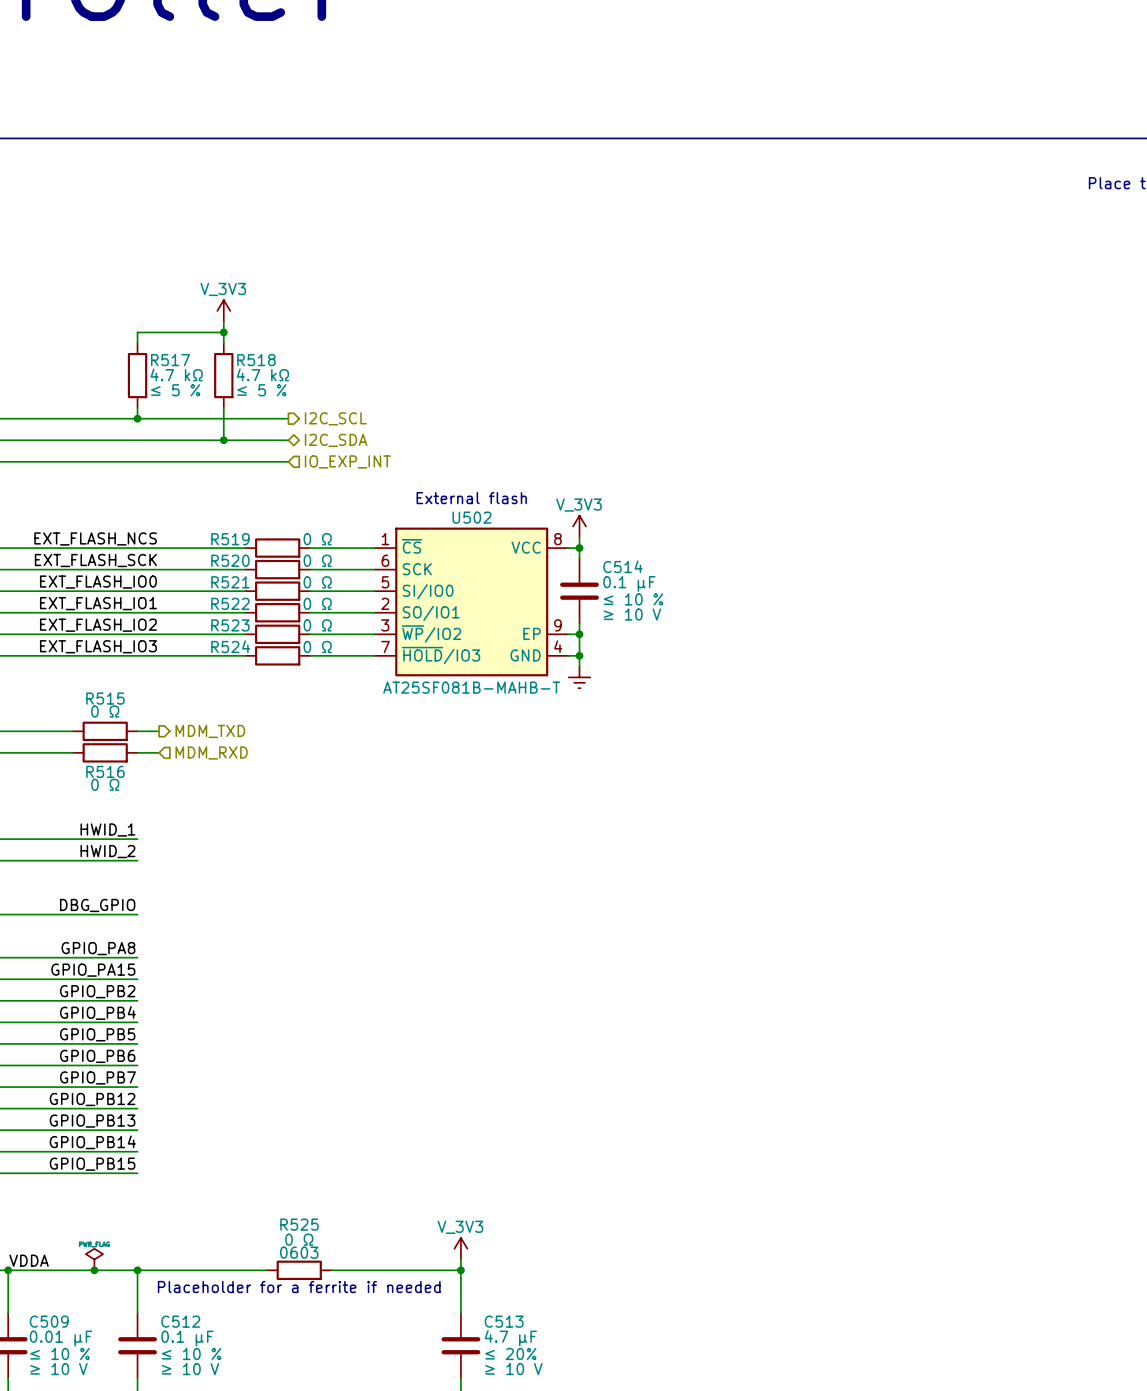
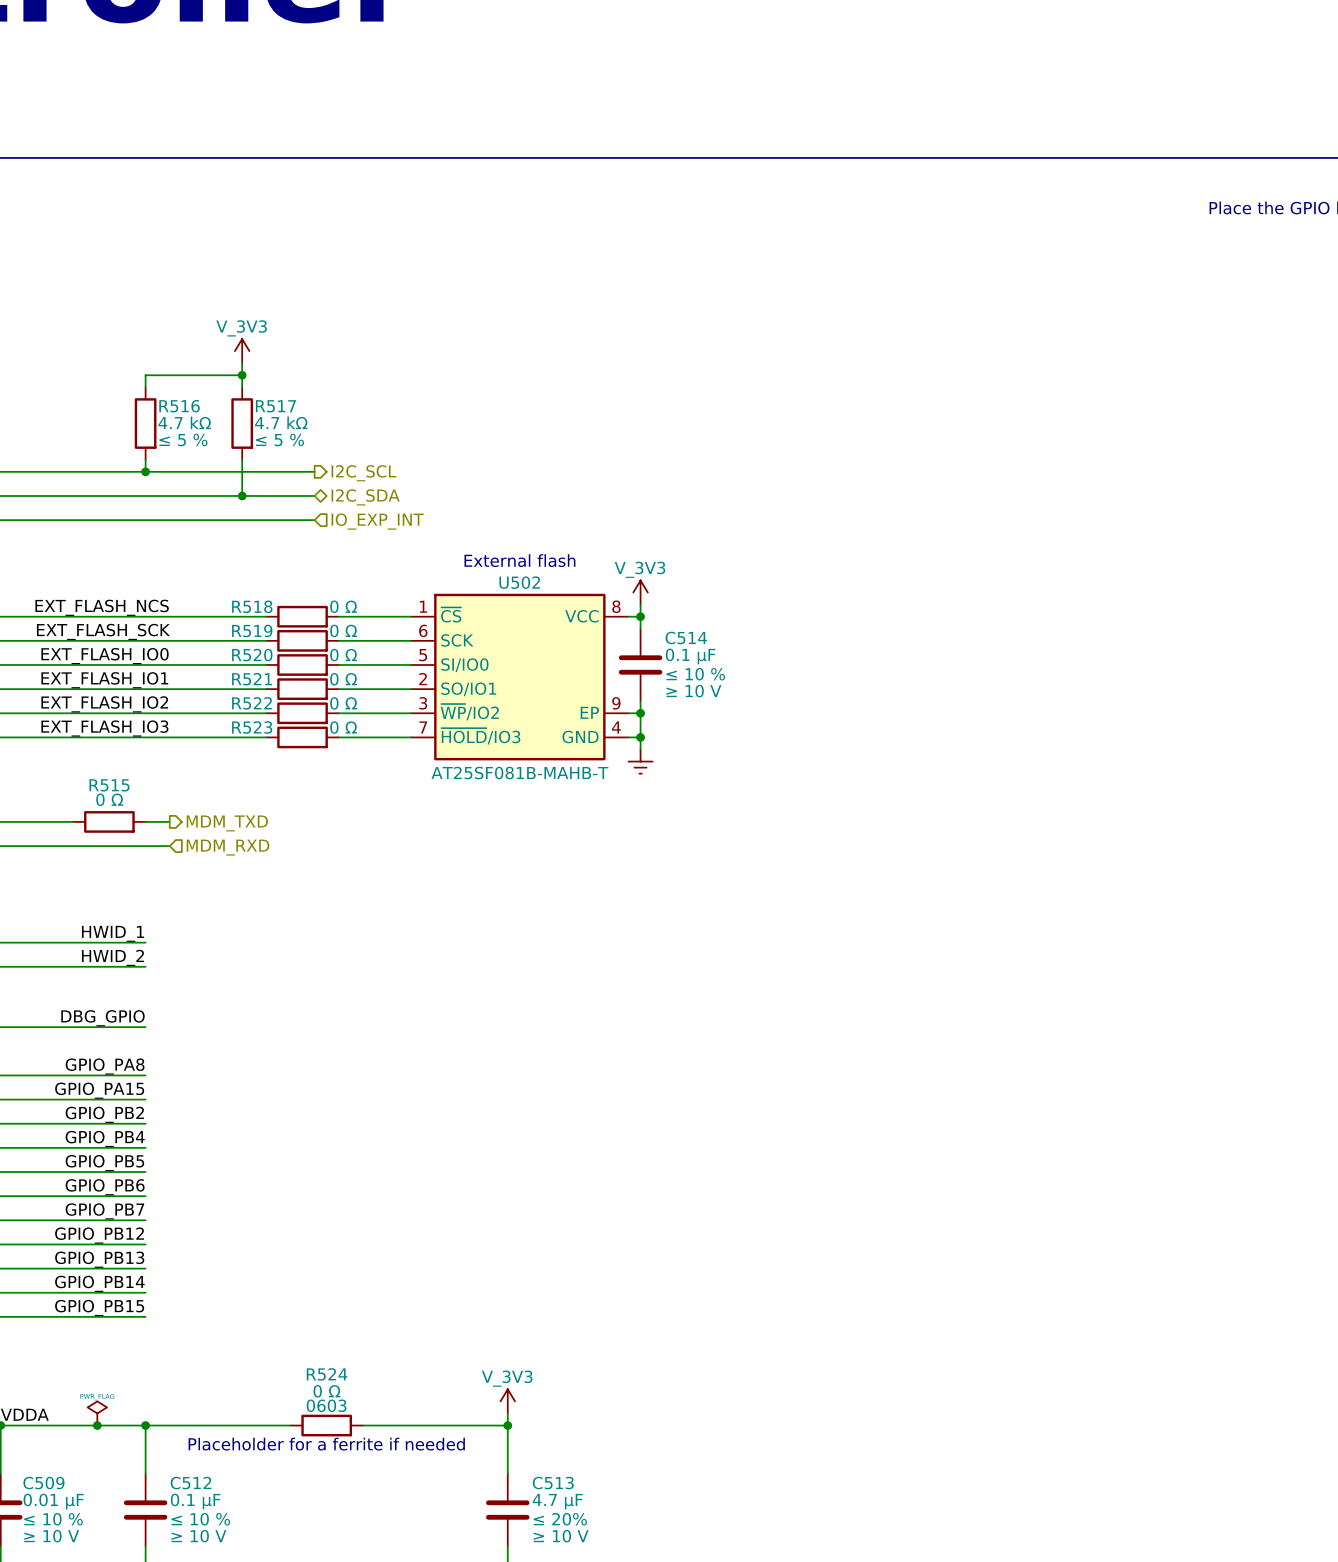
R517 name: R517 (170, 360) -> R516 (179, 406)
R518 name: R518 (256, 360) -> R517 (275, 406)
R519 name: R519 (230, 539) -> R518 (252, 606)
R520 name: R520 (230, 560) -> R519 (252, 630)
R521 name: R521 (230, 582) -> R520 (252, 655)
R522 name: R522 (230, 603) -> R521 (252, 679)
R523 name: R523 (230, 625) -> R522 (252, 703)
R524 name: R524 (230, 646) -> R523 (252, 727)
wire: none -> (73, 846) (145, 846)
R516: 0 Ω (105, 752) -> none
R525 name: R525 (299, 1224) -> R524 (327, 1374)

